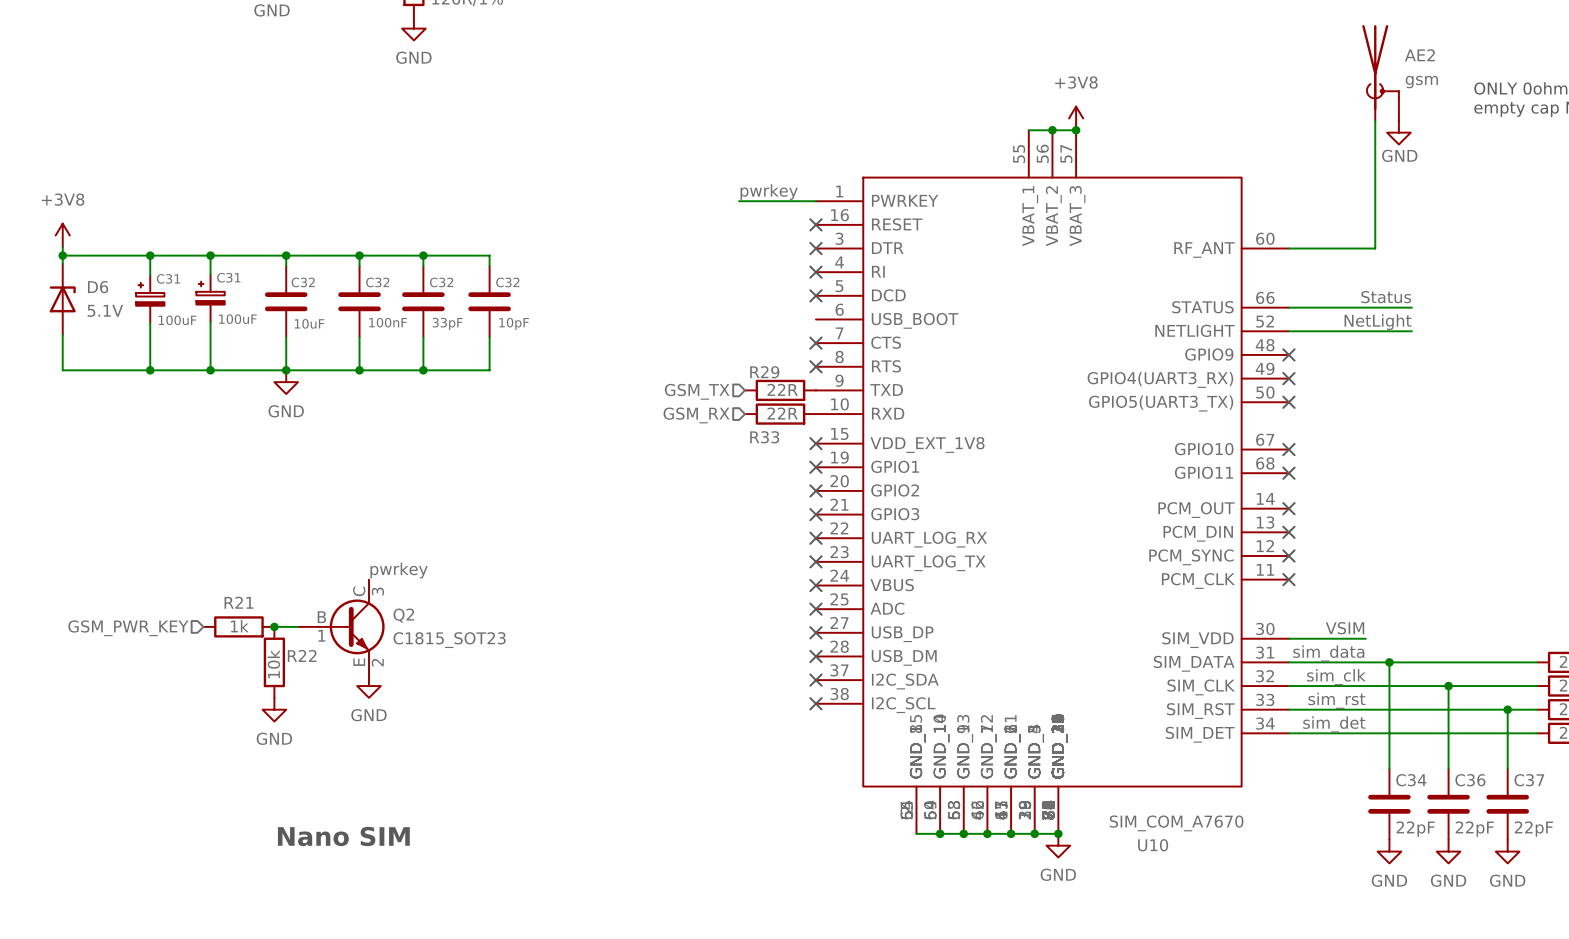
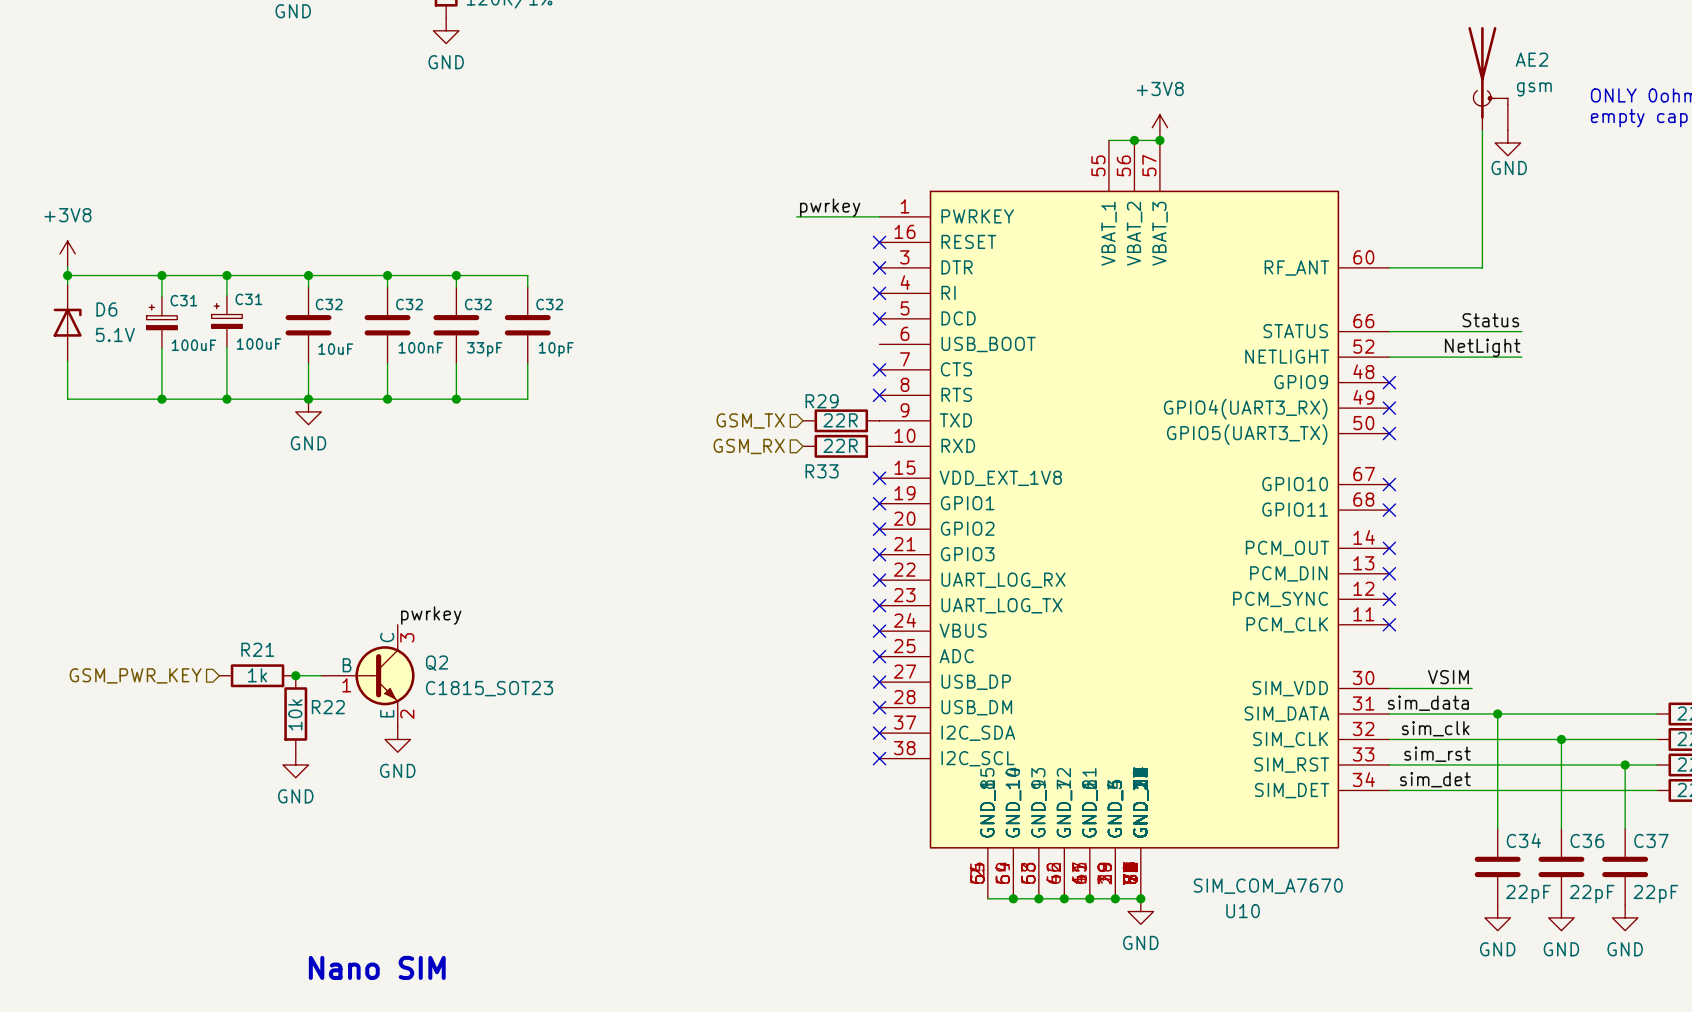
text position: Nano SIM (343, 836) -> Nano SIM (377, 967)

